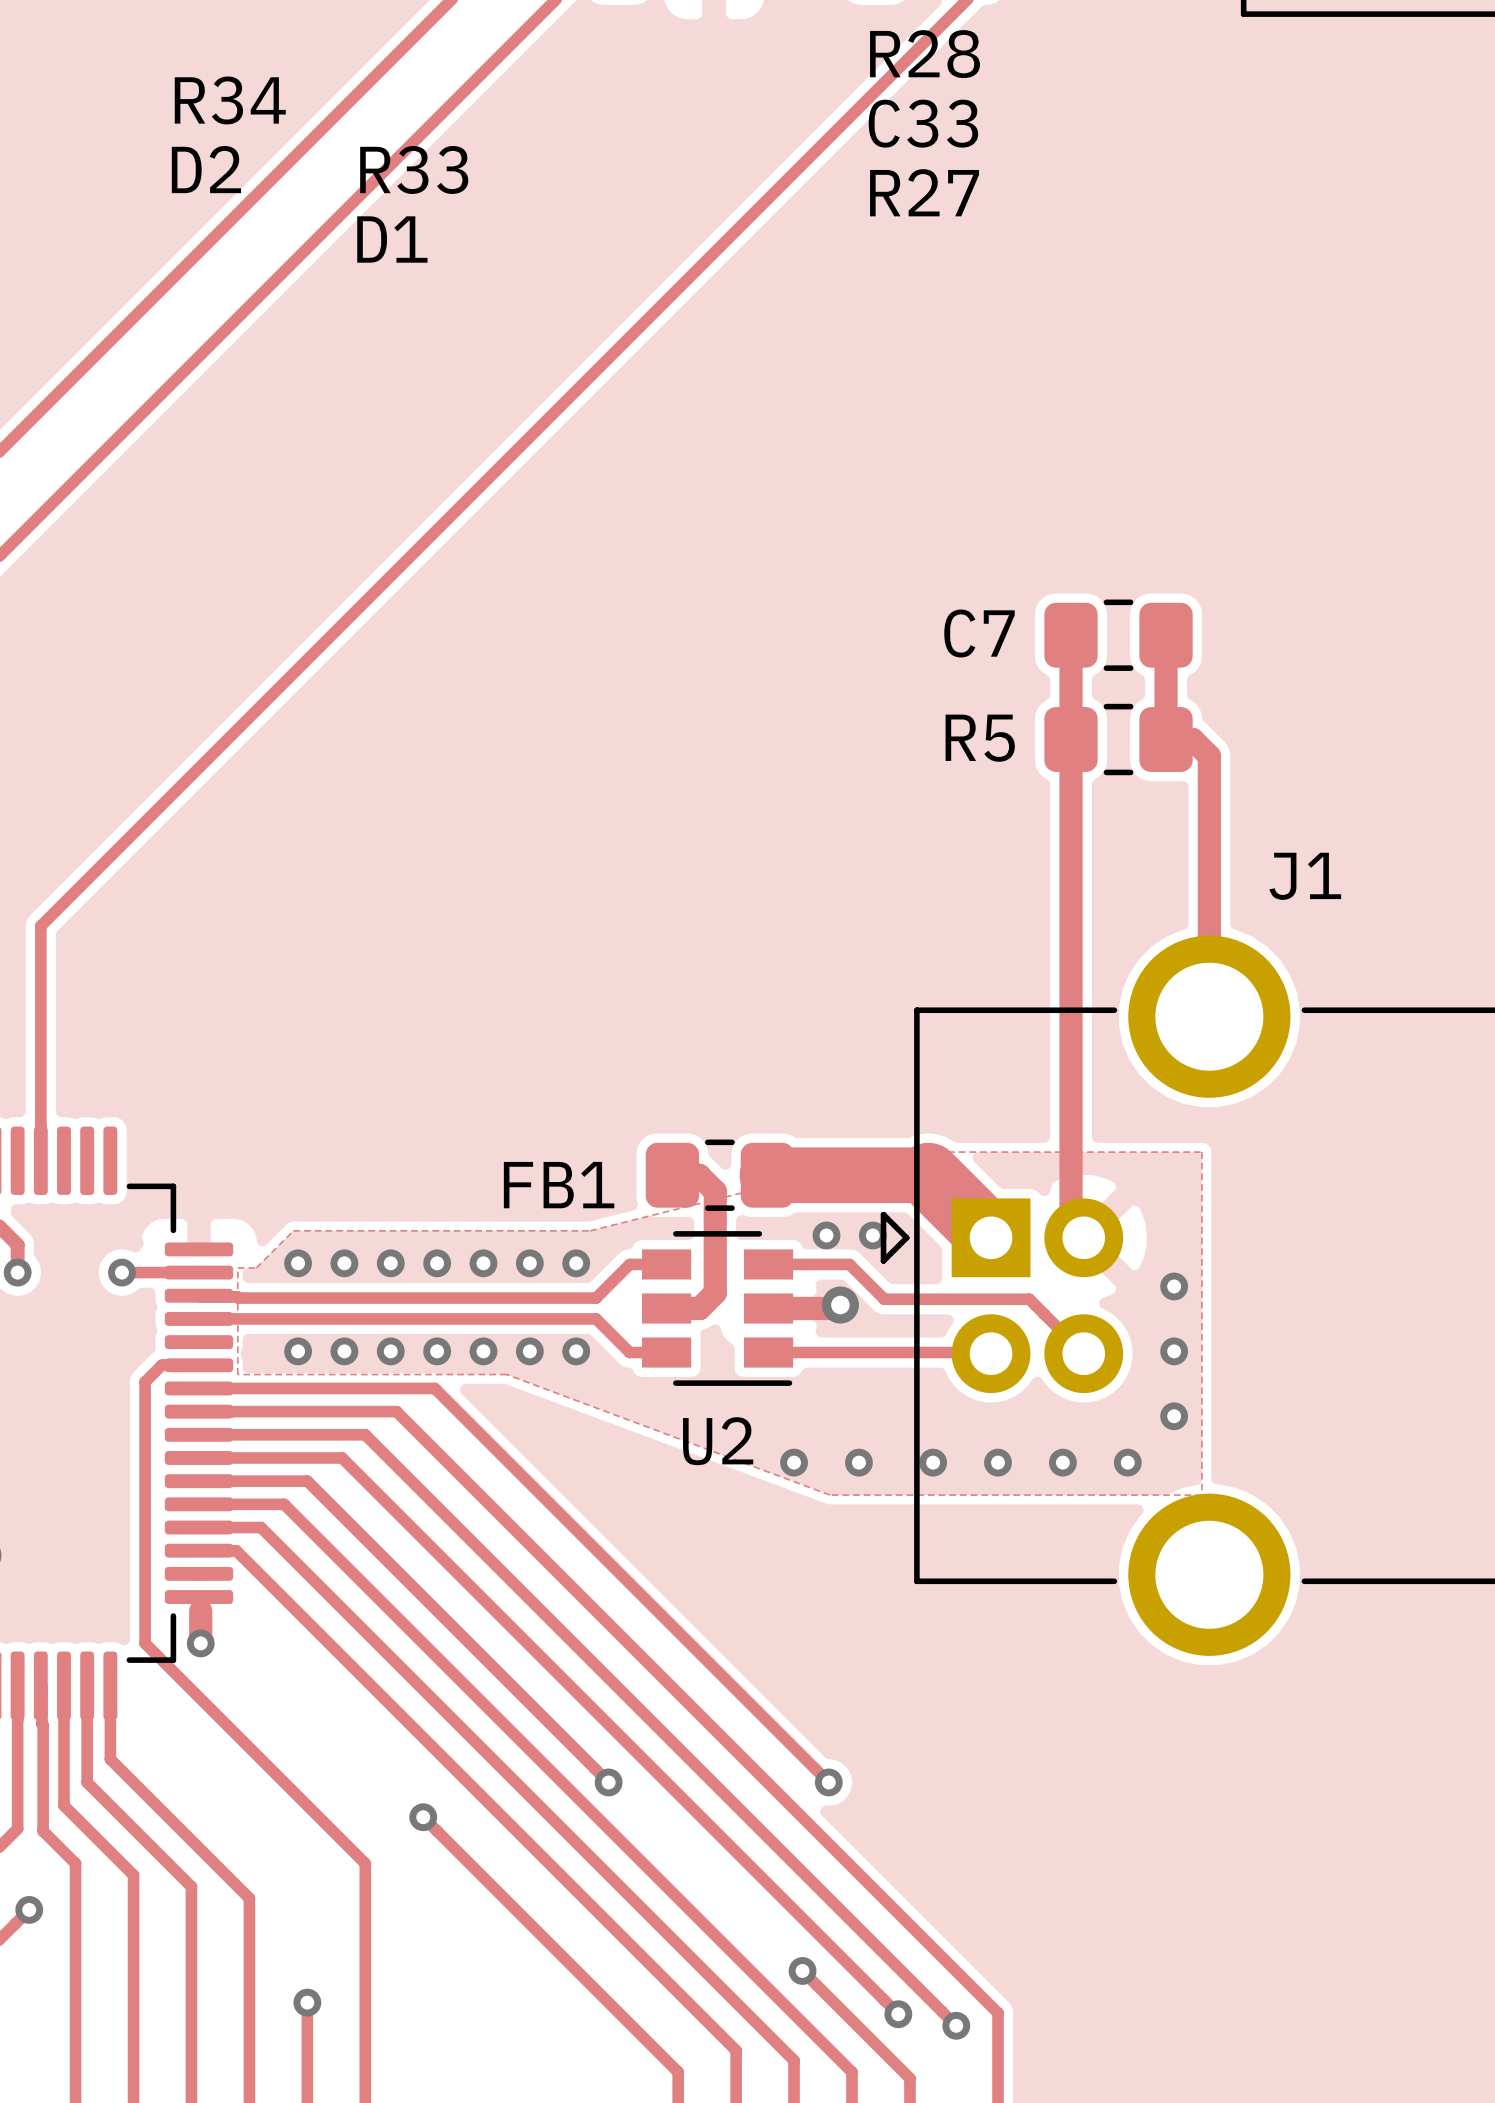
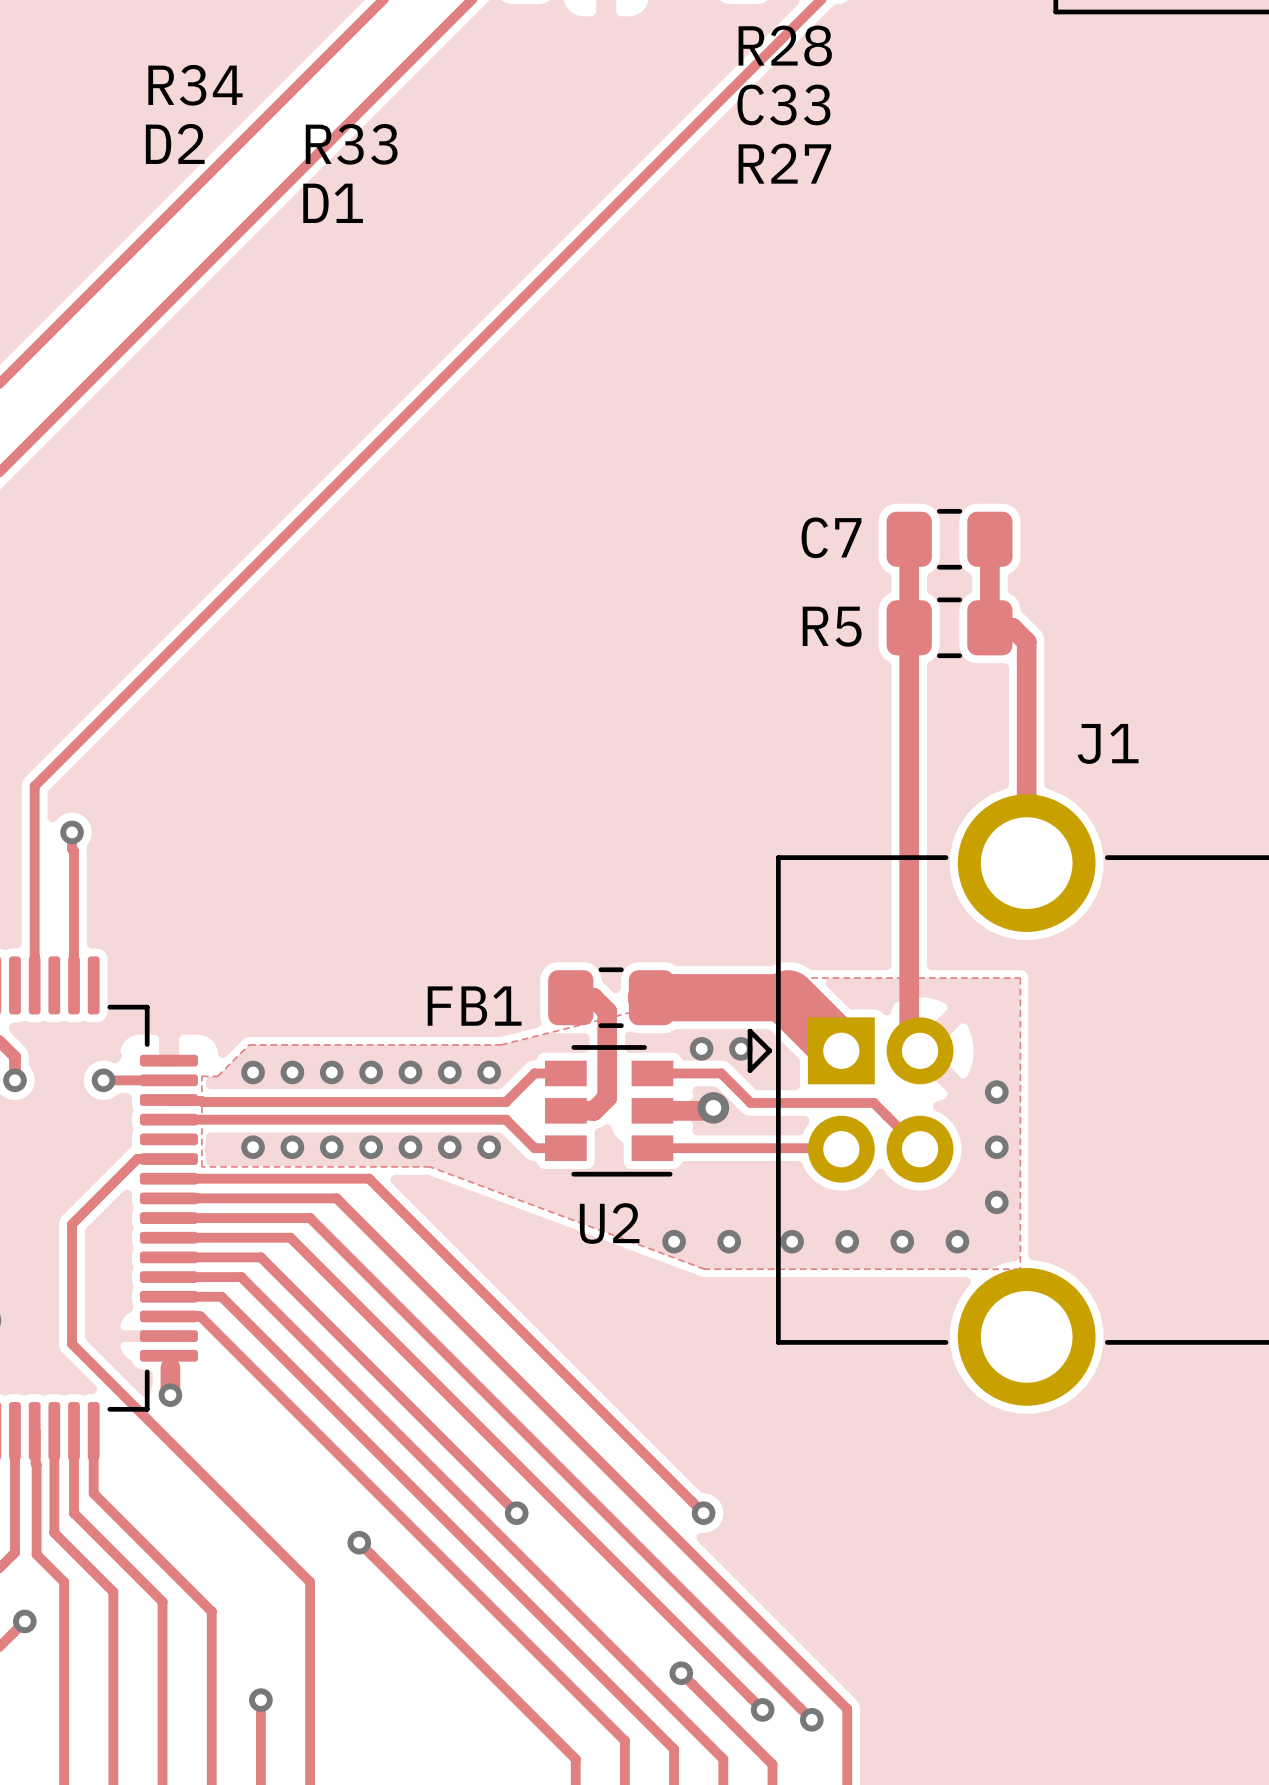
track: none -> (72, 832) (72, 849) (74, 851) (74, 985)
via: none -> (72, 832)
track: (145, 1381) (145, 1643) -> (123, 1173) (72, 1224) (72, 1343) (123, 1395)

